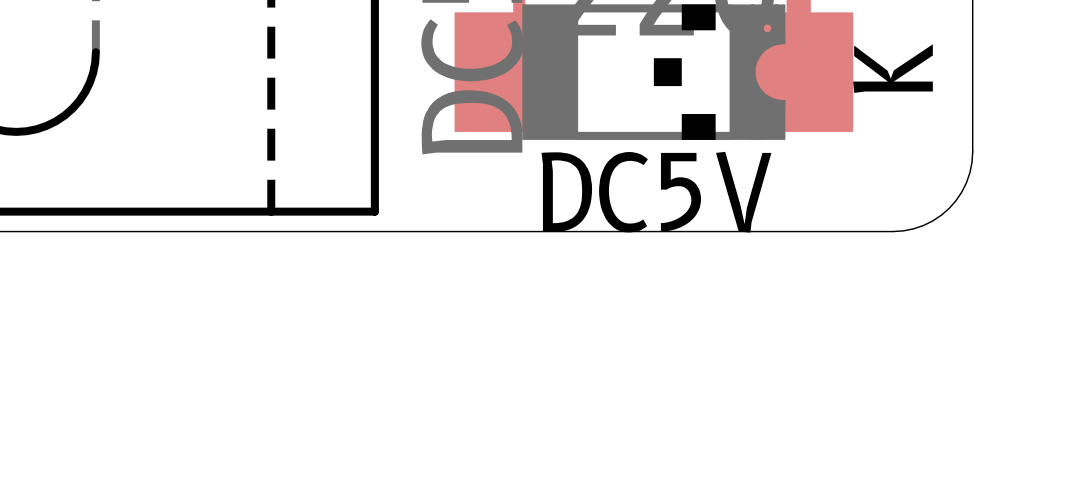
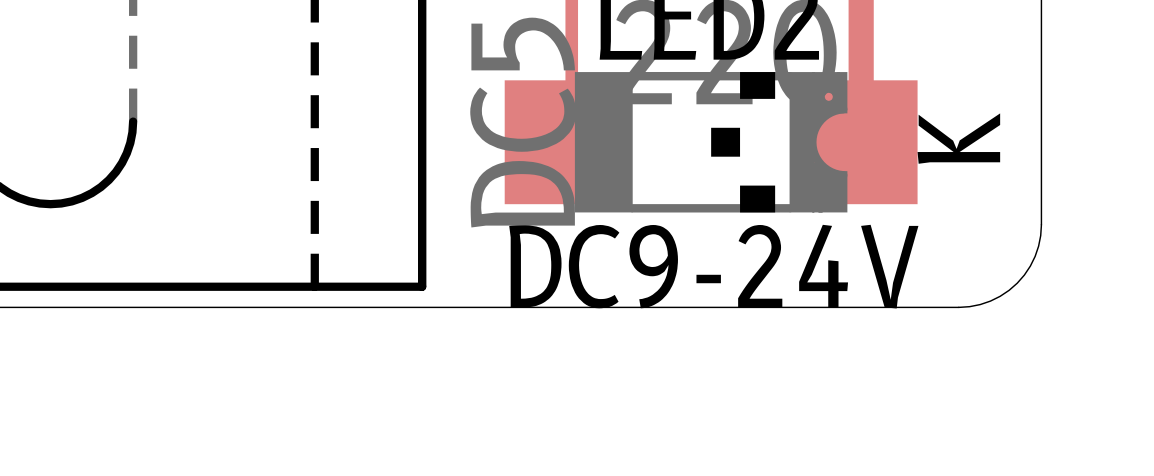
text: DC5V (656, 192) -> DC9-24V (713, 266)

